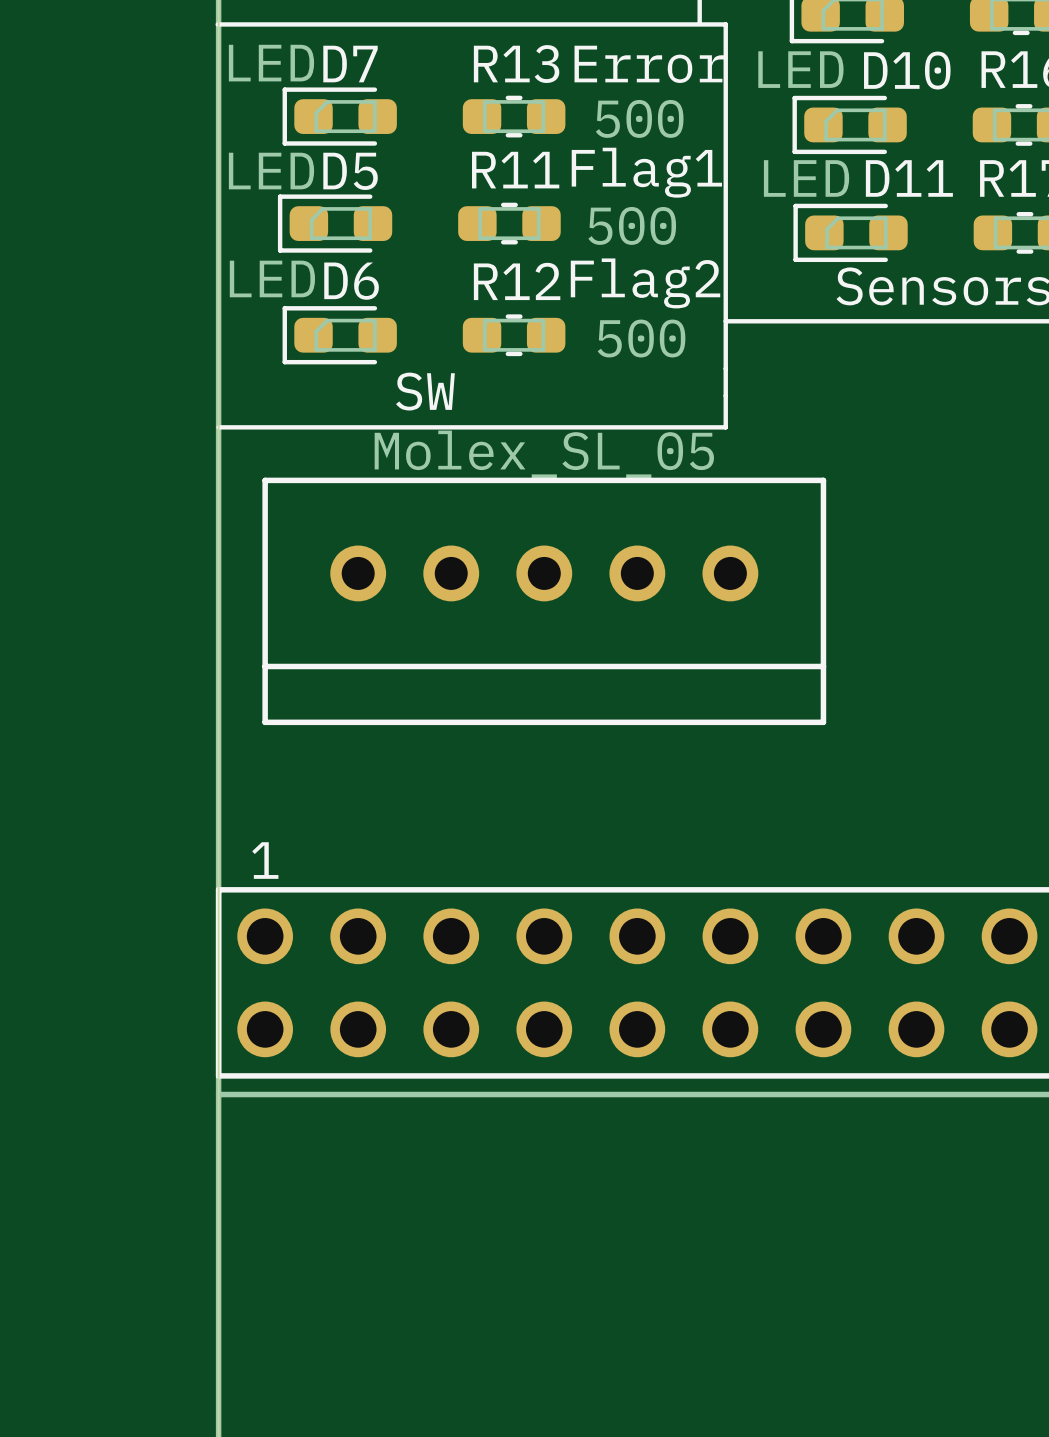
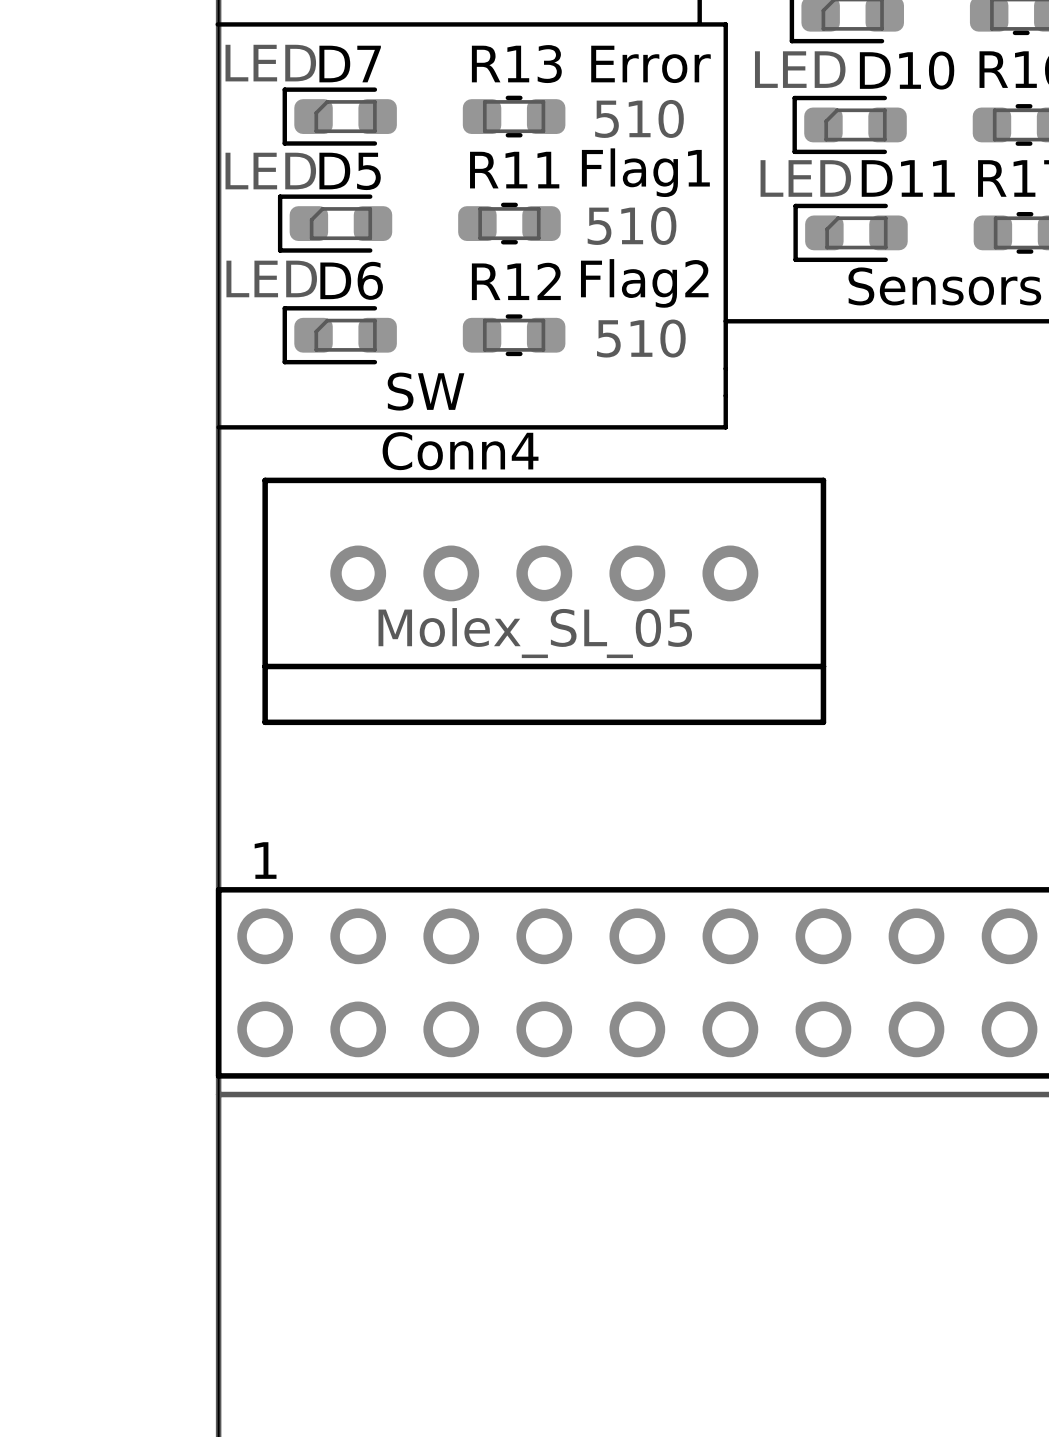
R13 value: 500 (639, 118) -> 510 (639, 118)
R11 value: 500 (632, 225) -> 510 (632, 225)
R12 value: 500 (641, 338) -> 510 (641, 338)
Conn4 name: none -> Conn4 (460, 451)
Conn4 value position: Molex_SL_05 (544, 454) -> Molex_SL_05 (535, 633)

